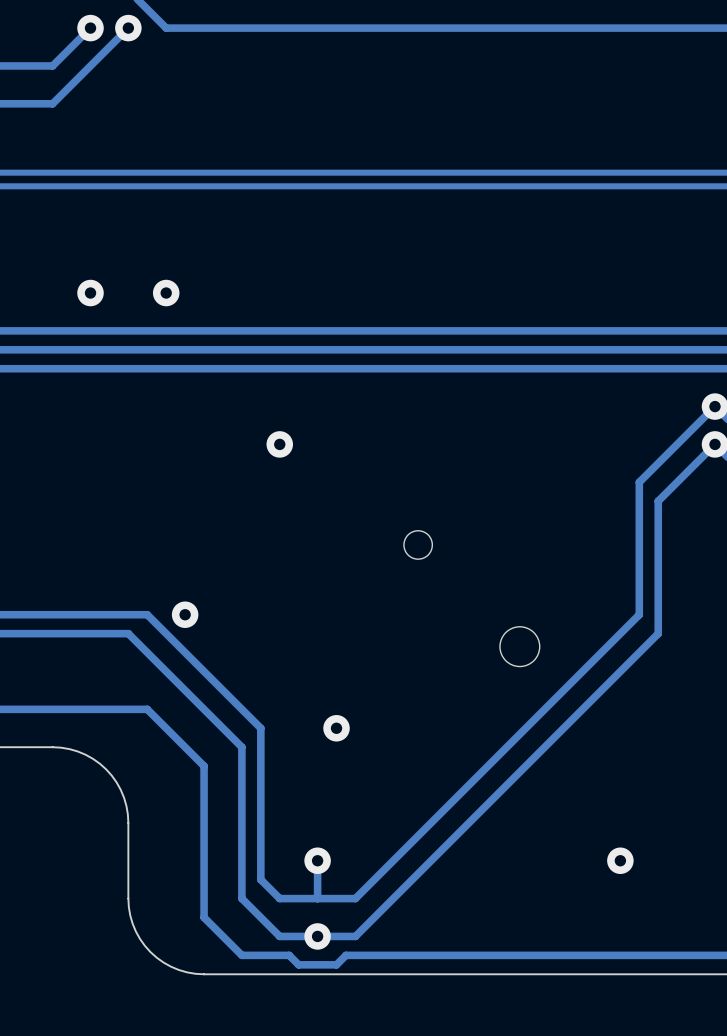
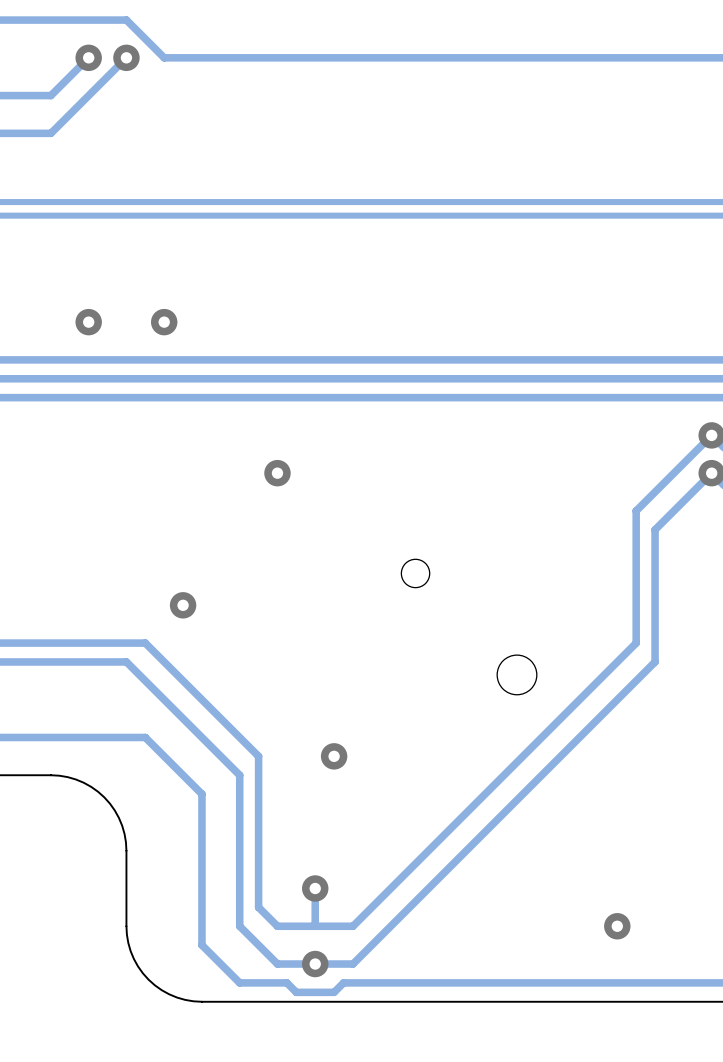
via position: (185, 614) -> (183, 605)
via position: (620, 860) -> (617, 926)

